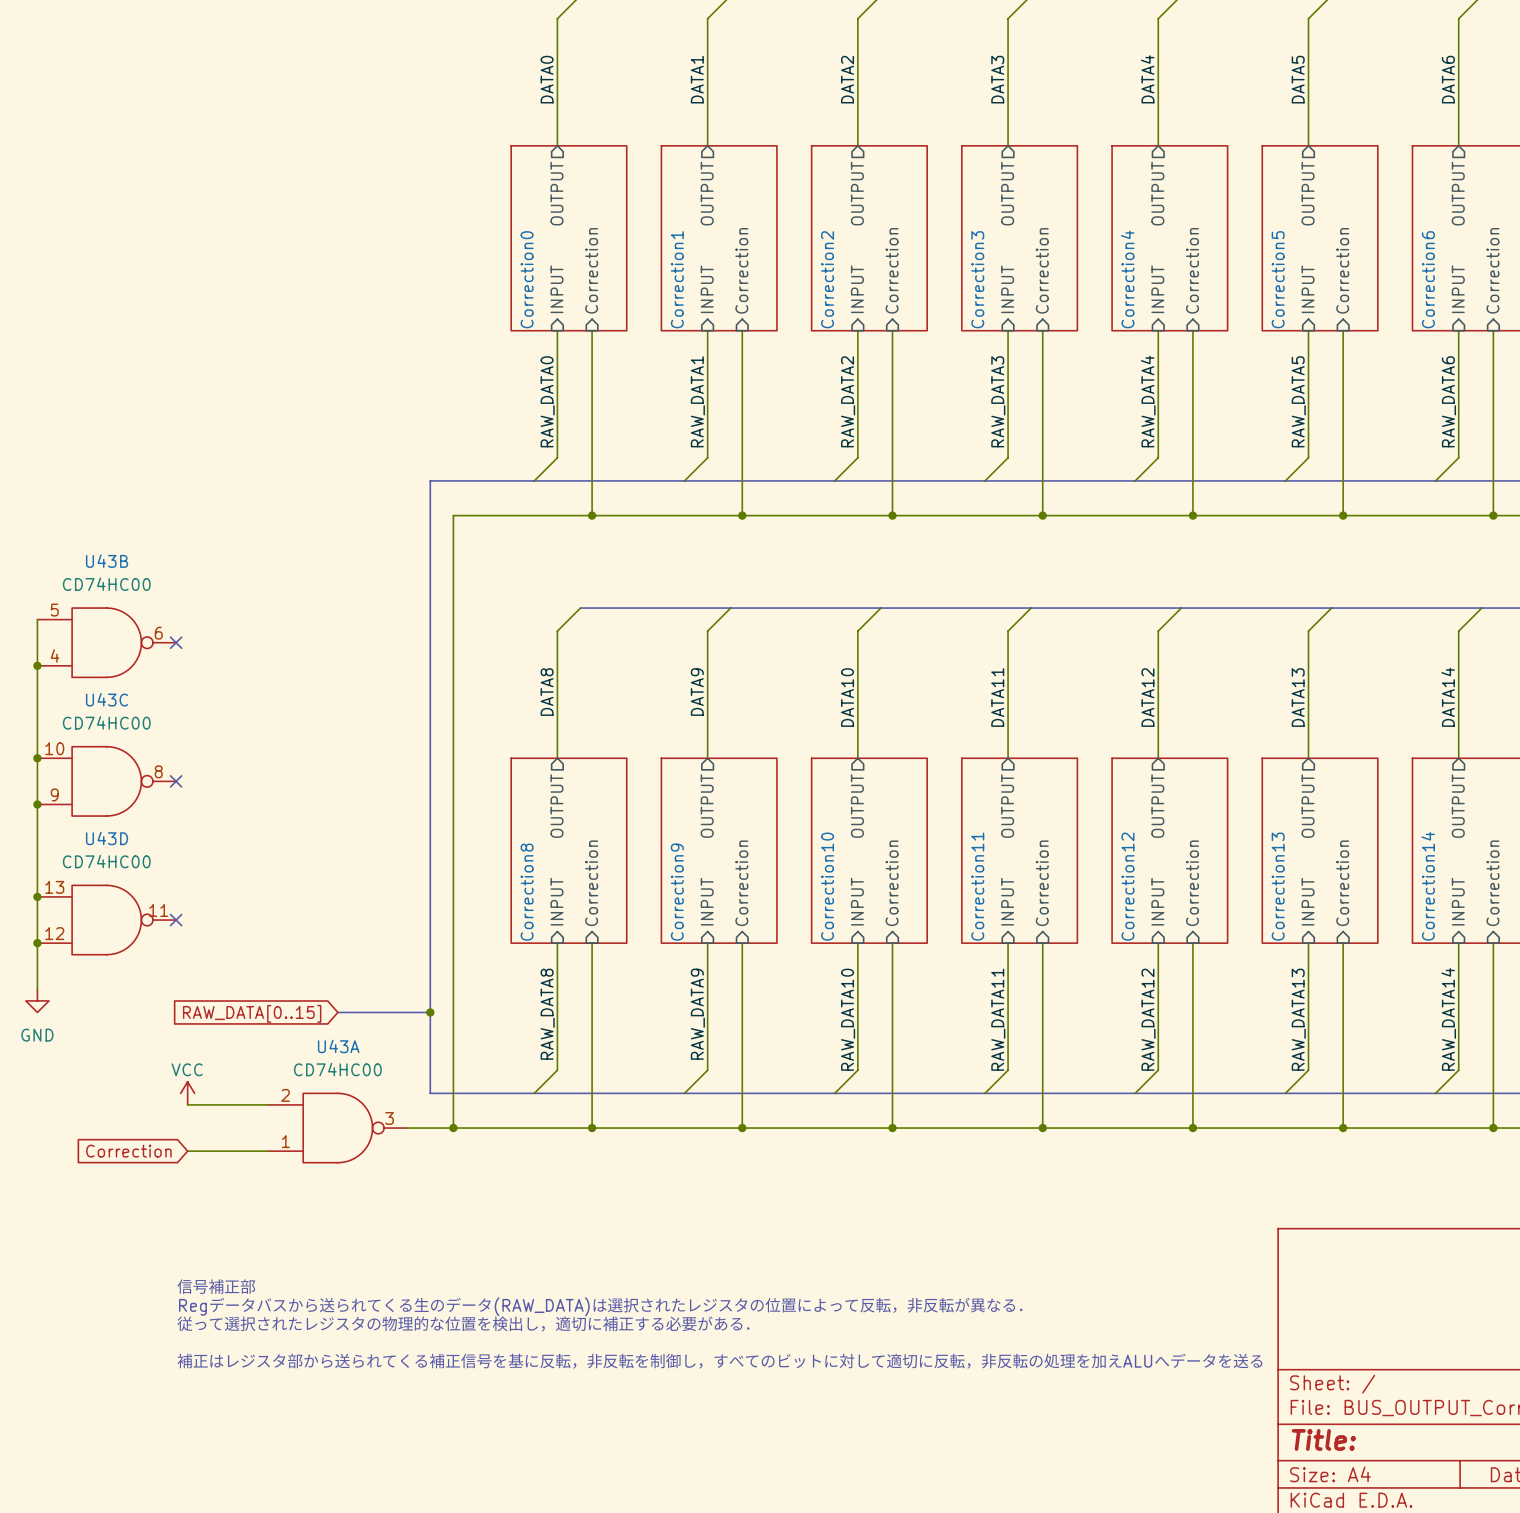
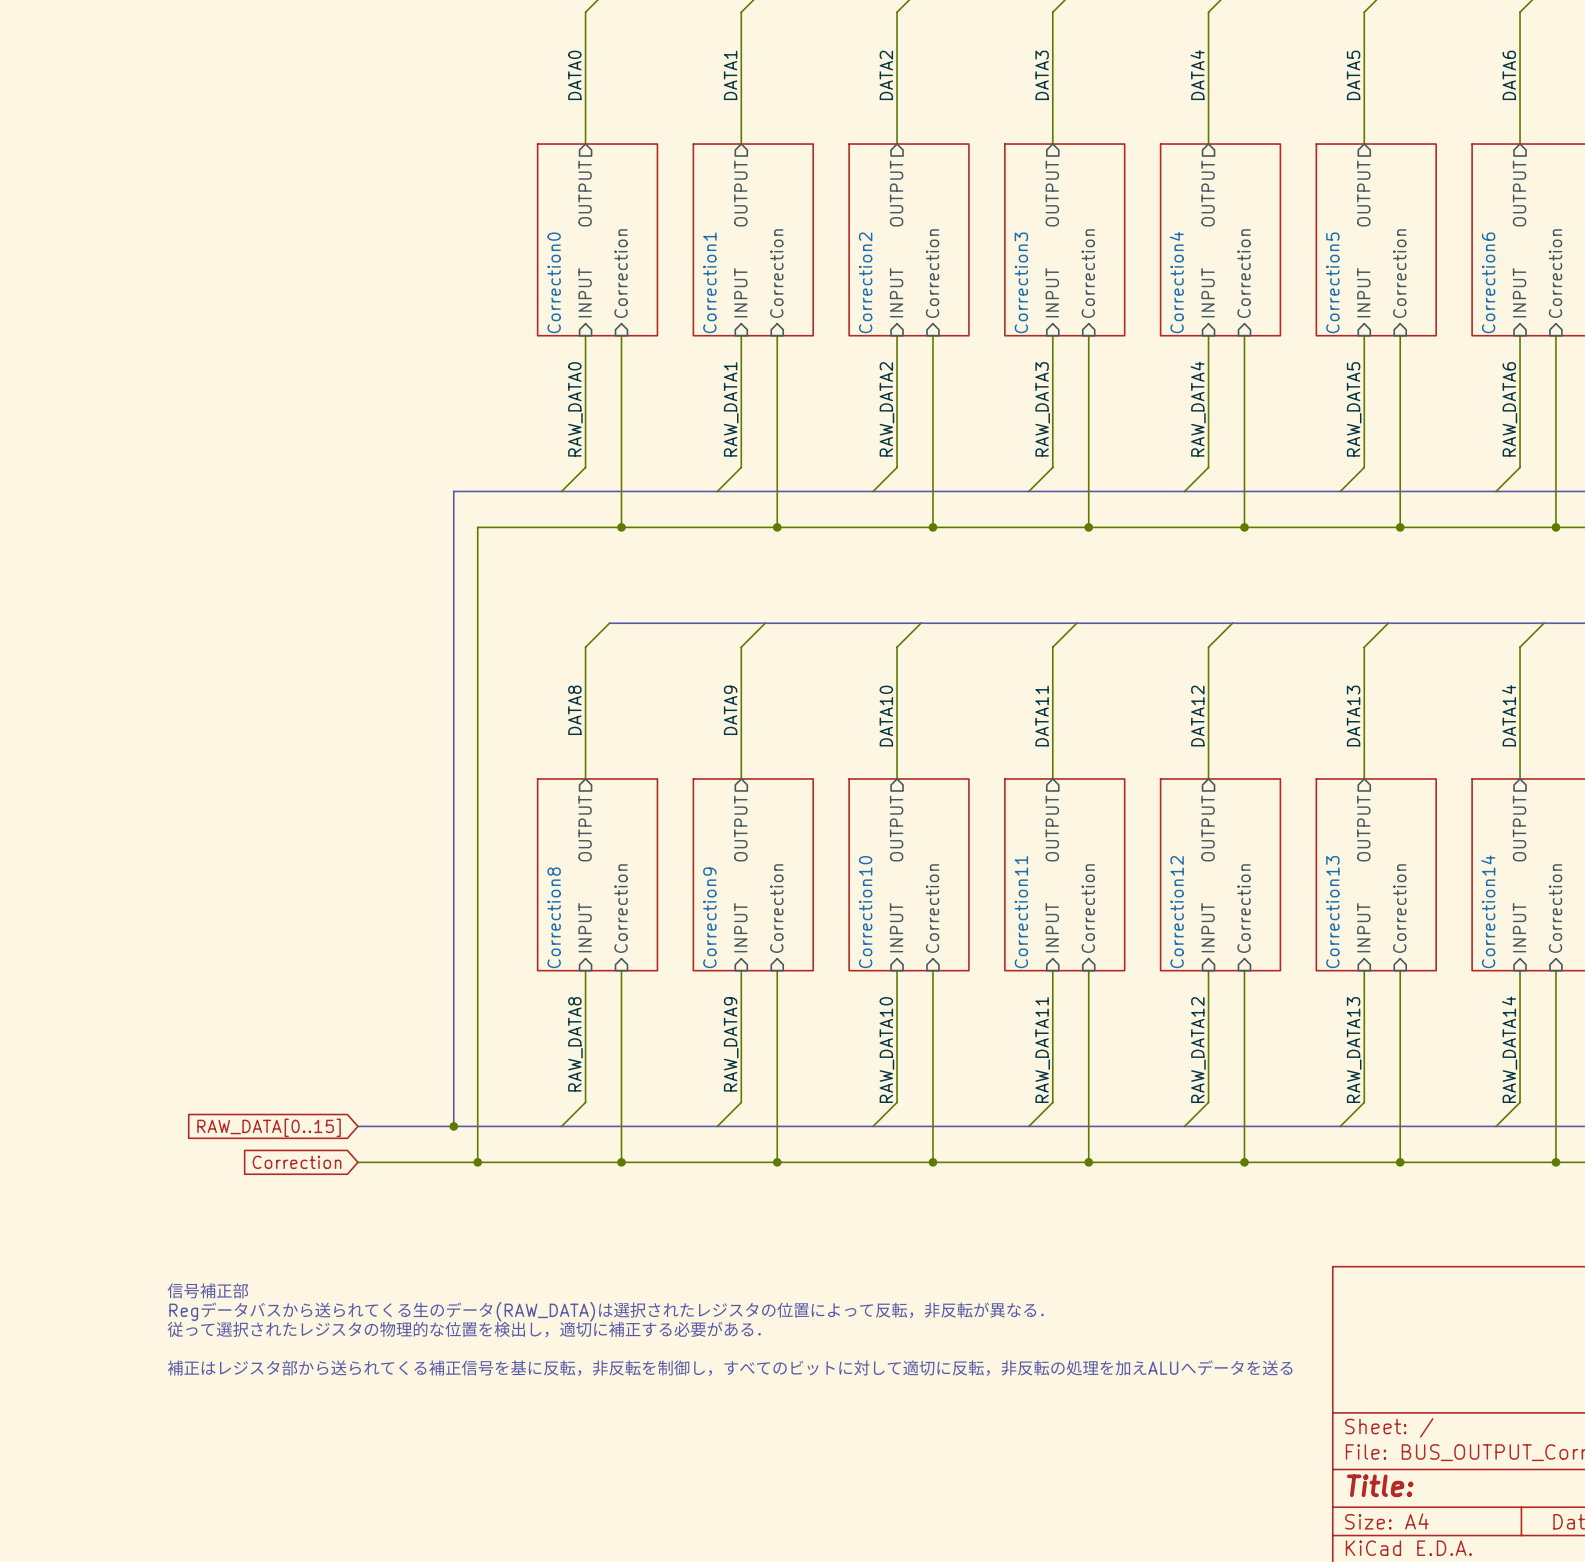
wire: (37, 619) (37, 989) -> none
U43B: CD74HC00 (106, 642) -> none
no-connect mark: (176, 642) -> none
junction: (37, 665) -> none
junction: (37, 758) -> none
U43C: CD74HC00 (106, 781) -> none
no-connect mark: (176, 781) -> none
junction: (37, 804) -> none
junction: (37, 896) -> none
U43D: CD74HC00 (106, 920) -> none
no-connect mark: (176, 920) -> none
junction: (37, 943) -> none
power symbol: GND (37, 1000) -> none
bus: (337, 1012) (430, 1012) -> (357, 1126) (453, 1126)
junction: (430, 1012) -> none
global label position: RAW_DATA[0..15] (252, 1013) -> RAW_DATA[0..15] (269, 1127)
power symbol: VCC (187, 1093) -> none
junction: none -> (453, 1126)
wire: none -> (357, 1162) (429, 1162)
U43A: CD74HC00 (337, 1128) -> none
global label position: Correction (128, 1151) -> Correction (297, 1162)
wire: (187, 1151) (268, 1151) -> none
text position: 信号補正部 (216, 1286) -> 信号補正部 (207, 1290)
text position: Regデータバスから送られてくる生のデータ(RAW_DATA)は選択されたレジスタの位置によって反転，非反転が異なる． (601, 1306) -> Regデータバスから送られてくる生のデータ(RAW_DATA)は選択されたレジスタの位置によって反転，非反転が異なる． (606, 1311)
text position: 従って選択されたレジスタの物理的な位置を検出し，適切に補正する必要がある． (463, 1323) -> 従って選択されたレジスタの物理的な位置を検出し，適切に補正する必要がある． (464, 1329)
text position: 補正はレジスタ部から送られてくる補正信号を基に反転，非反転を制御し，すべてのビットに対して適切に反転，非反転の処理を加えALUへデータを送る (719, 1361) -> 補正はレジスタ部から送られてくる補正信号を基に反転，非反転を制御し，すべてのビットに対して適切に反転，非反転の処理を加えALUへデータを送る (730, 1368)

